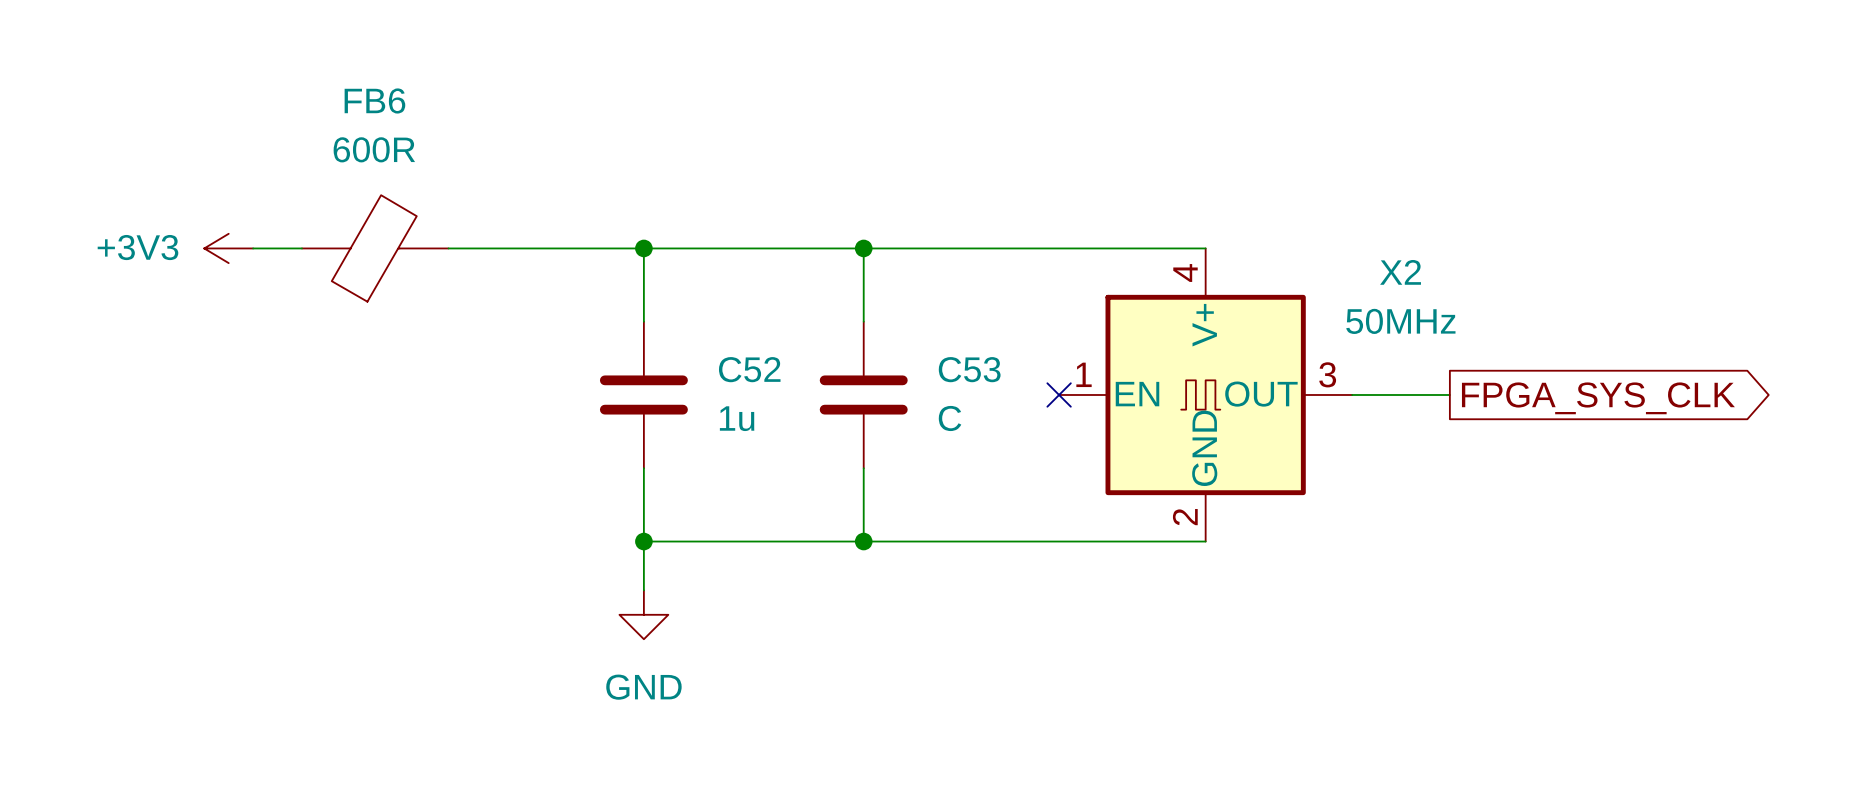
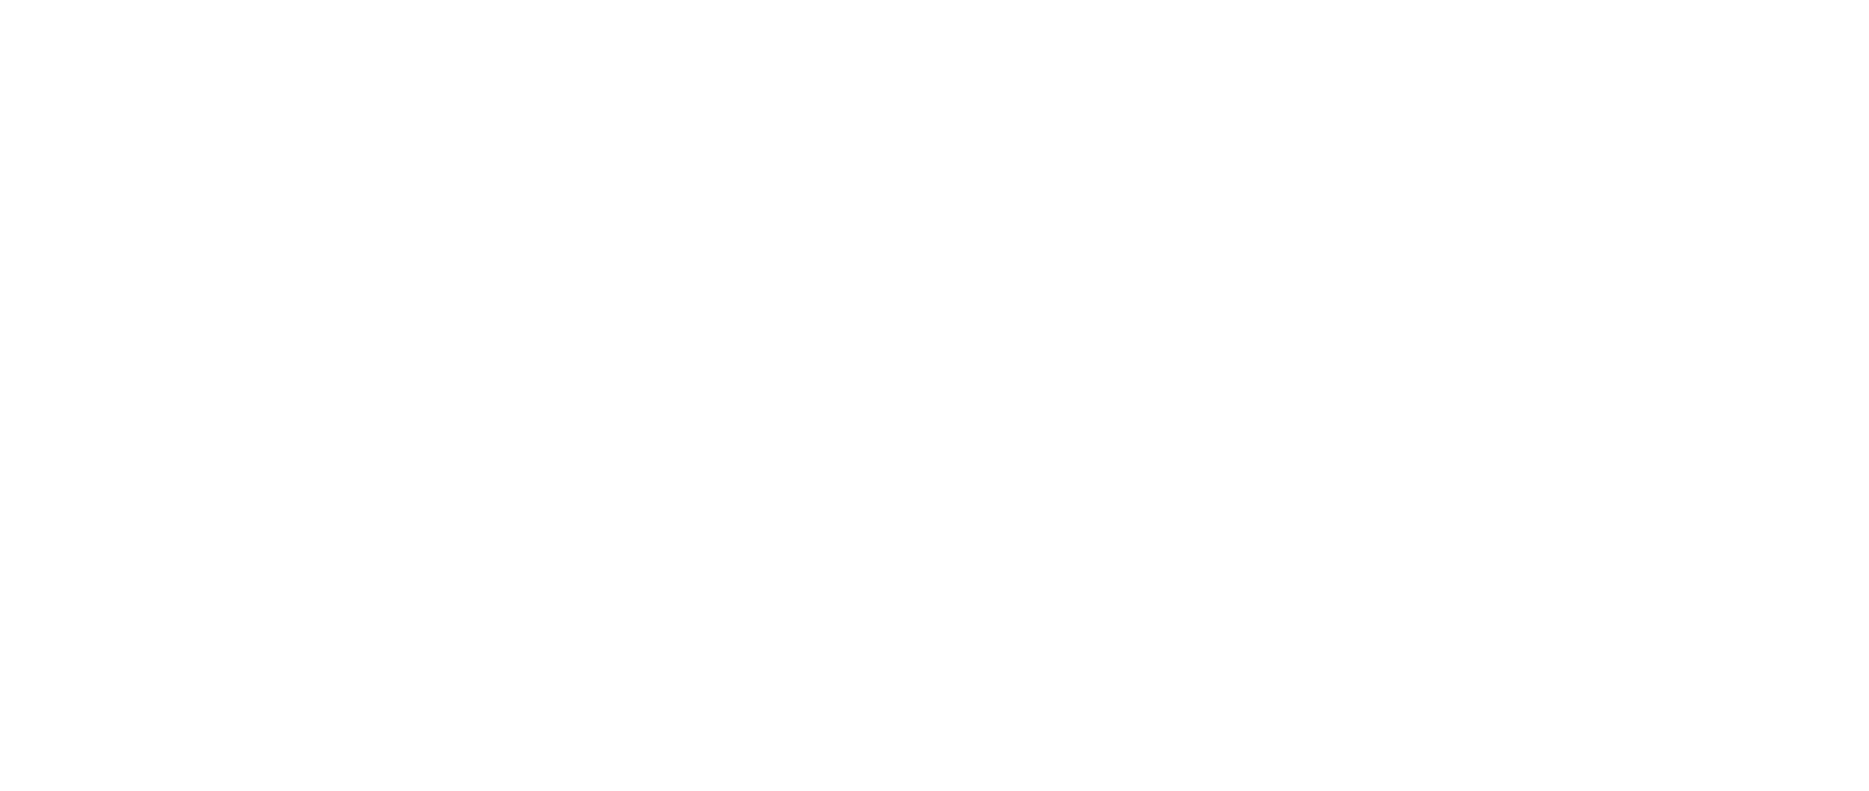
power symbol: +3V3 (228, 248) -> none
wire: (253, 248) (301, 248) -> none
FB6: 600R (375, 248) -> none
wire: (448, 248) (1205, 248) -> none
wire: (643, 248) (643, 321) -> none
junction: (643, 248) -> none
wire: (863, 248) (863, 321) -> none
junction: (863, 248) -> none
C52: 1u (643, 394) -> none
C53: C (863, 394) -> none
no-connect mark: (1059, 394) -> none
X2: 50MHz (1205, 394) -> none
wire: (1352, 394) (1449, 394) -> none
global label: FPGA_SYS_CLK (1598, 398) -> none
wire: (643, 468) (643, 590) -> none
wire: (863, 468) (863, 541) -> none
wire: (643, 541) (1205, 541) -> none
junction: (643, 541) -> none
junction: (863, 541) -> none
power symbol: GND (643, 614) -> none

